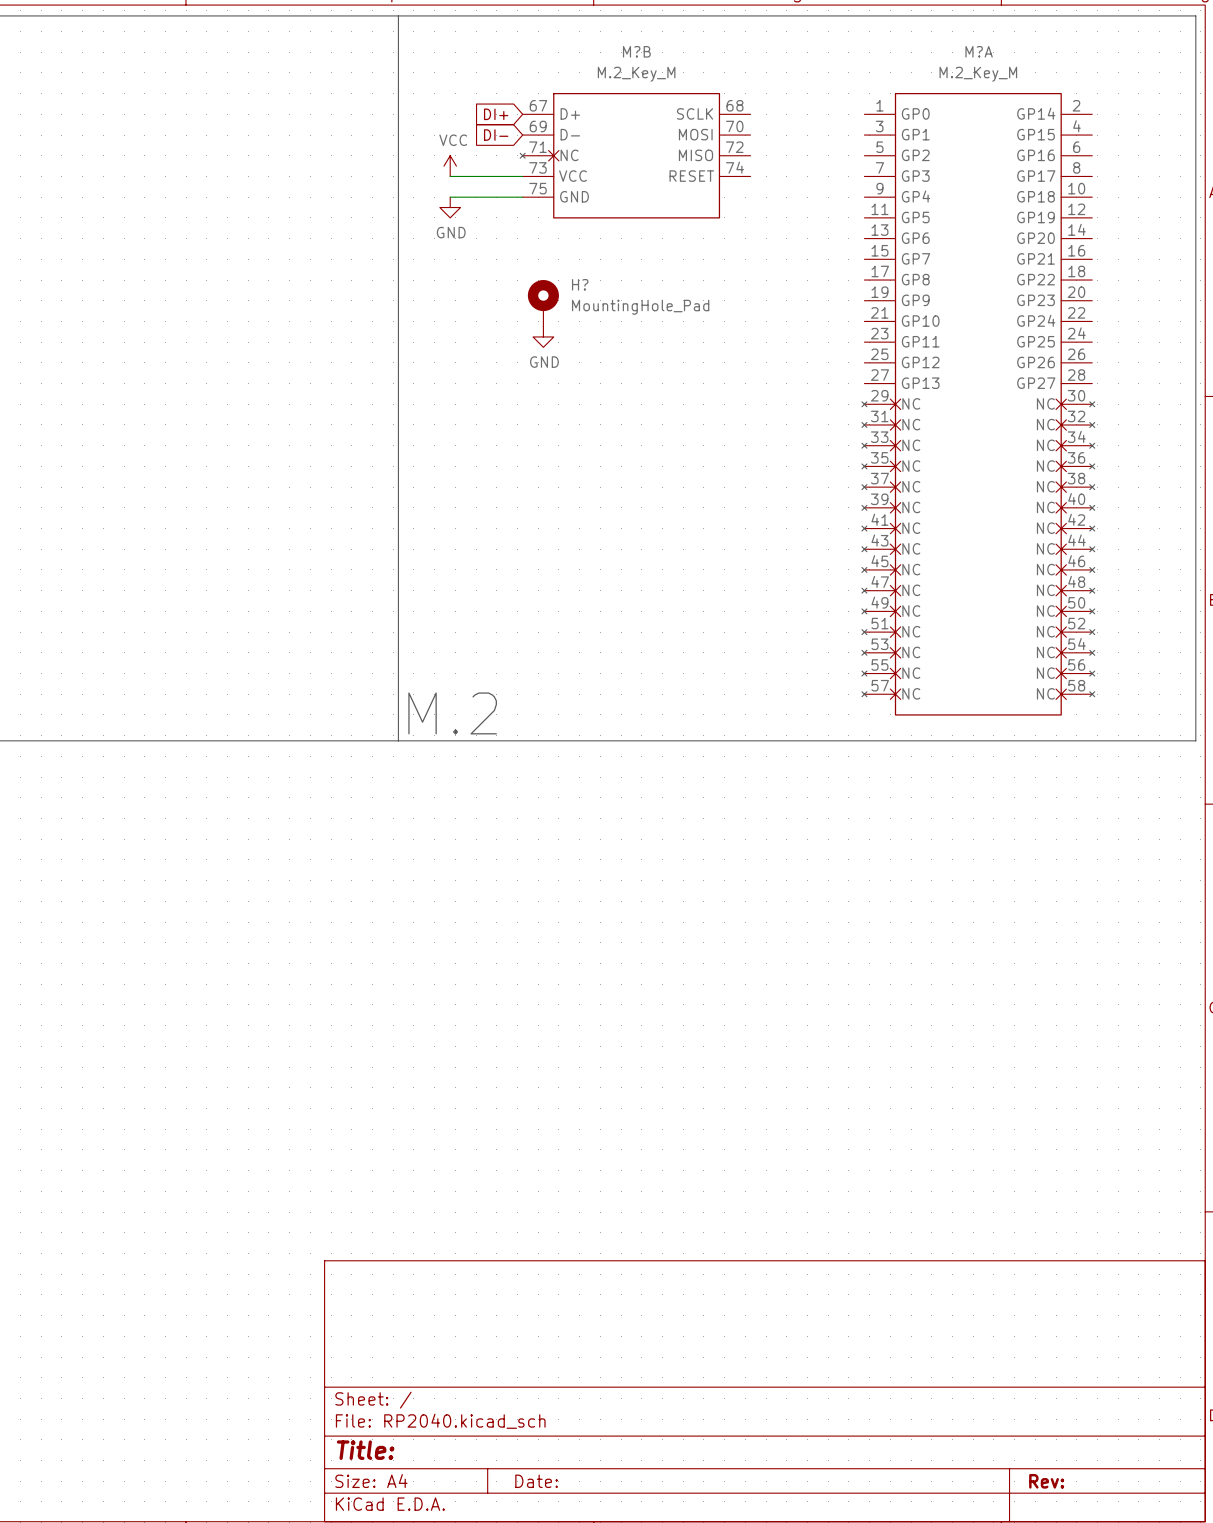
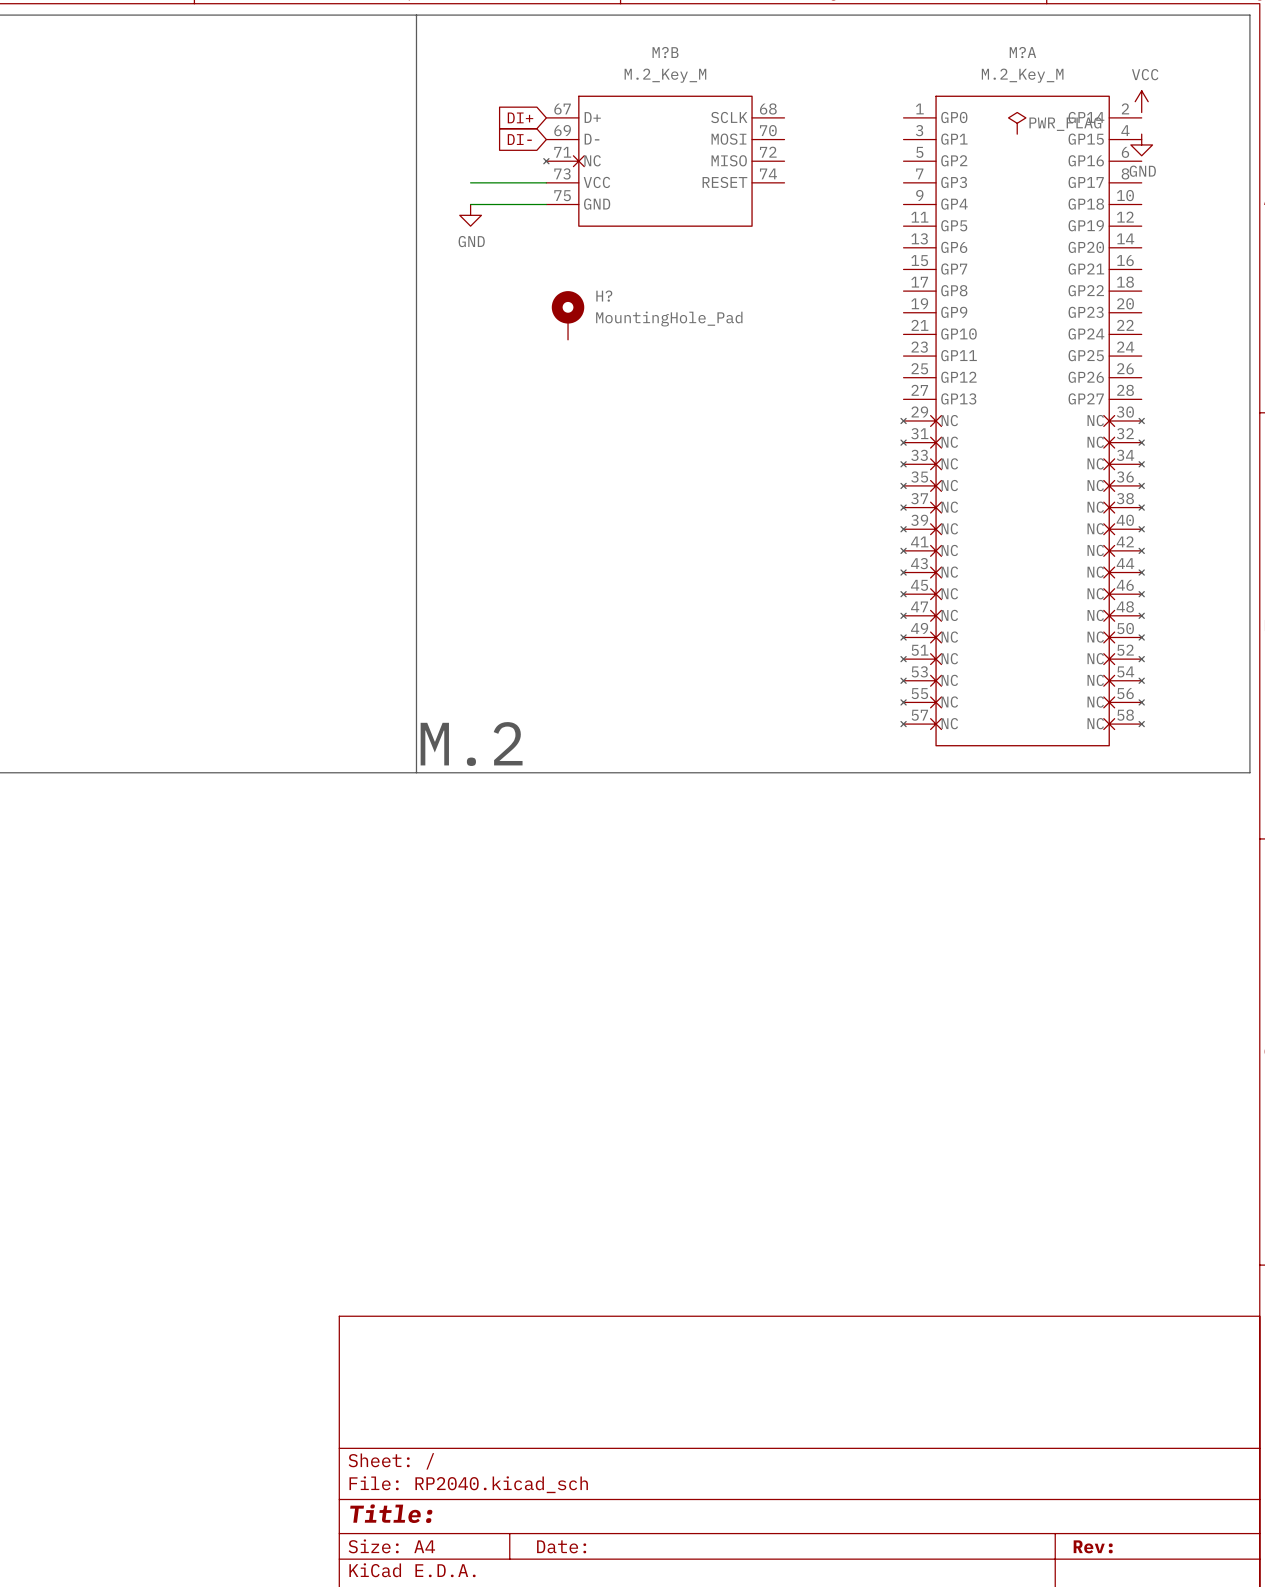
power symbol: none -> VCC (1141, 101)
power symbol: none -> PWR_FLAG (1017, 123)
power symbol: none -> GND (1141, 144)
power symbol: VCC (450, 166) -> none
power symbol: GND (543, 336) -> none

